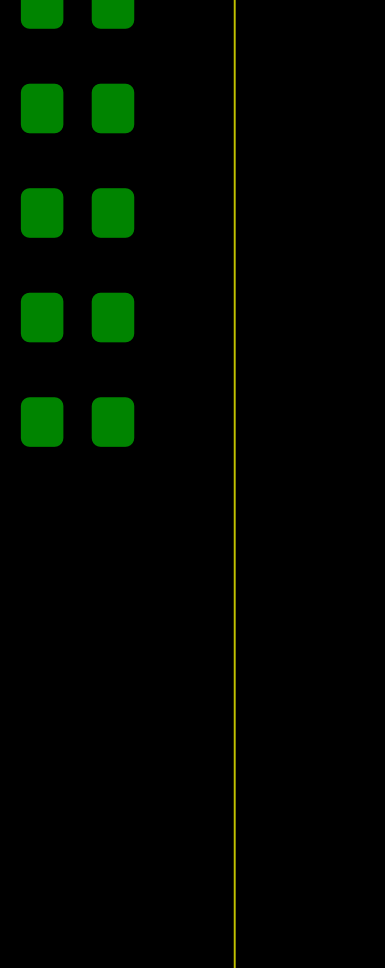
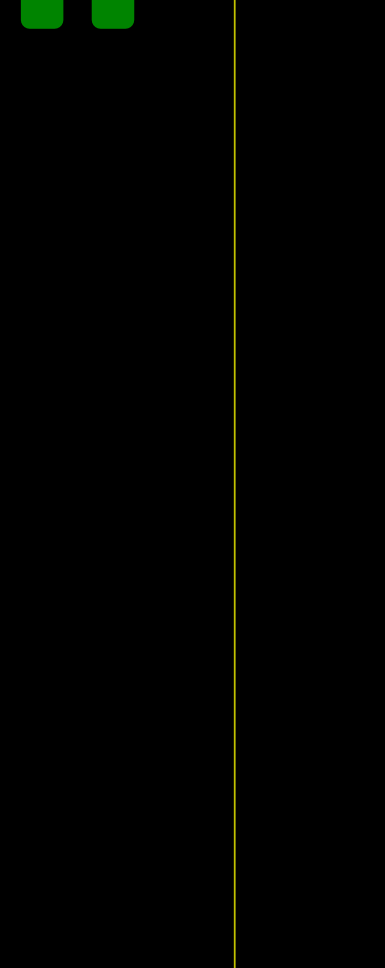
part: (77, 108) -> none
part: (77, 213) -> none
part: (77, 317) -> none
part: (77, 422) -> none

